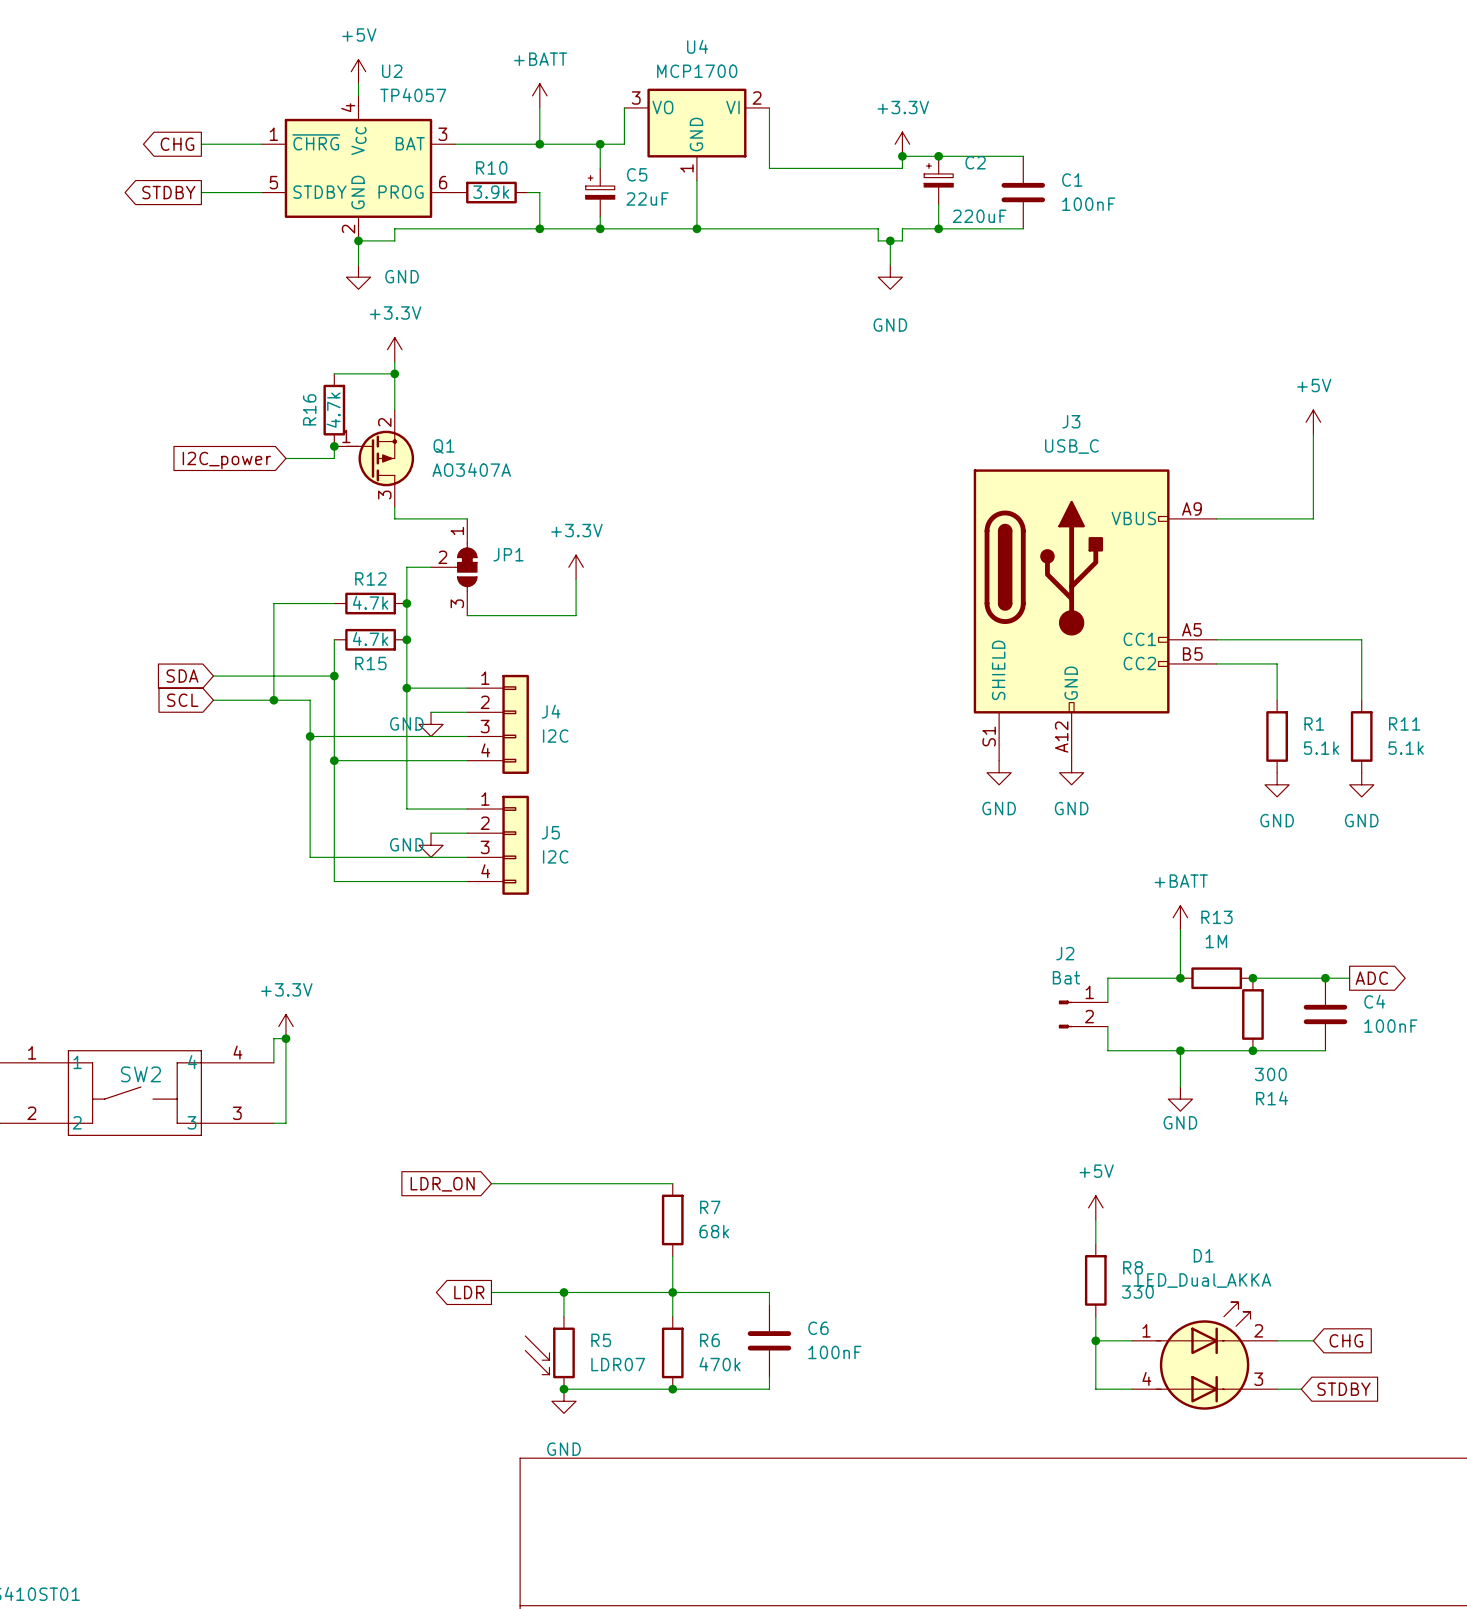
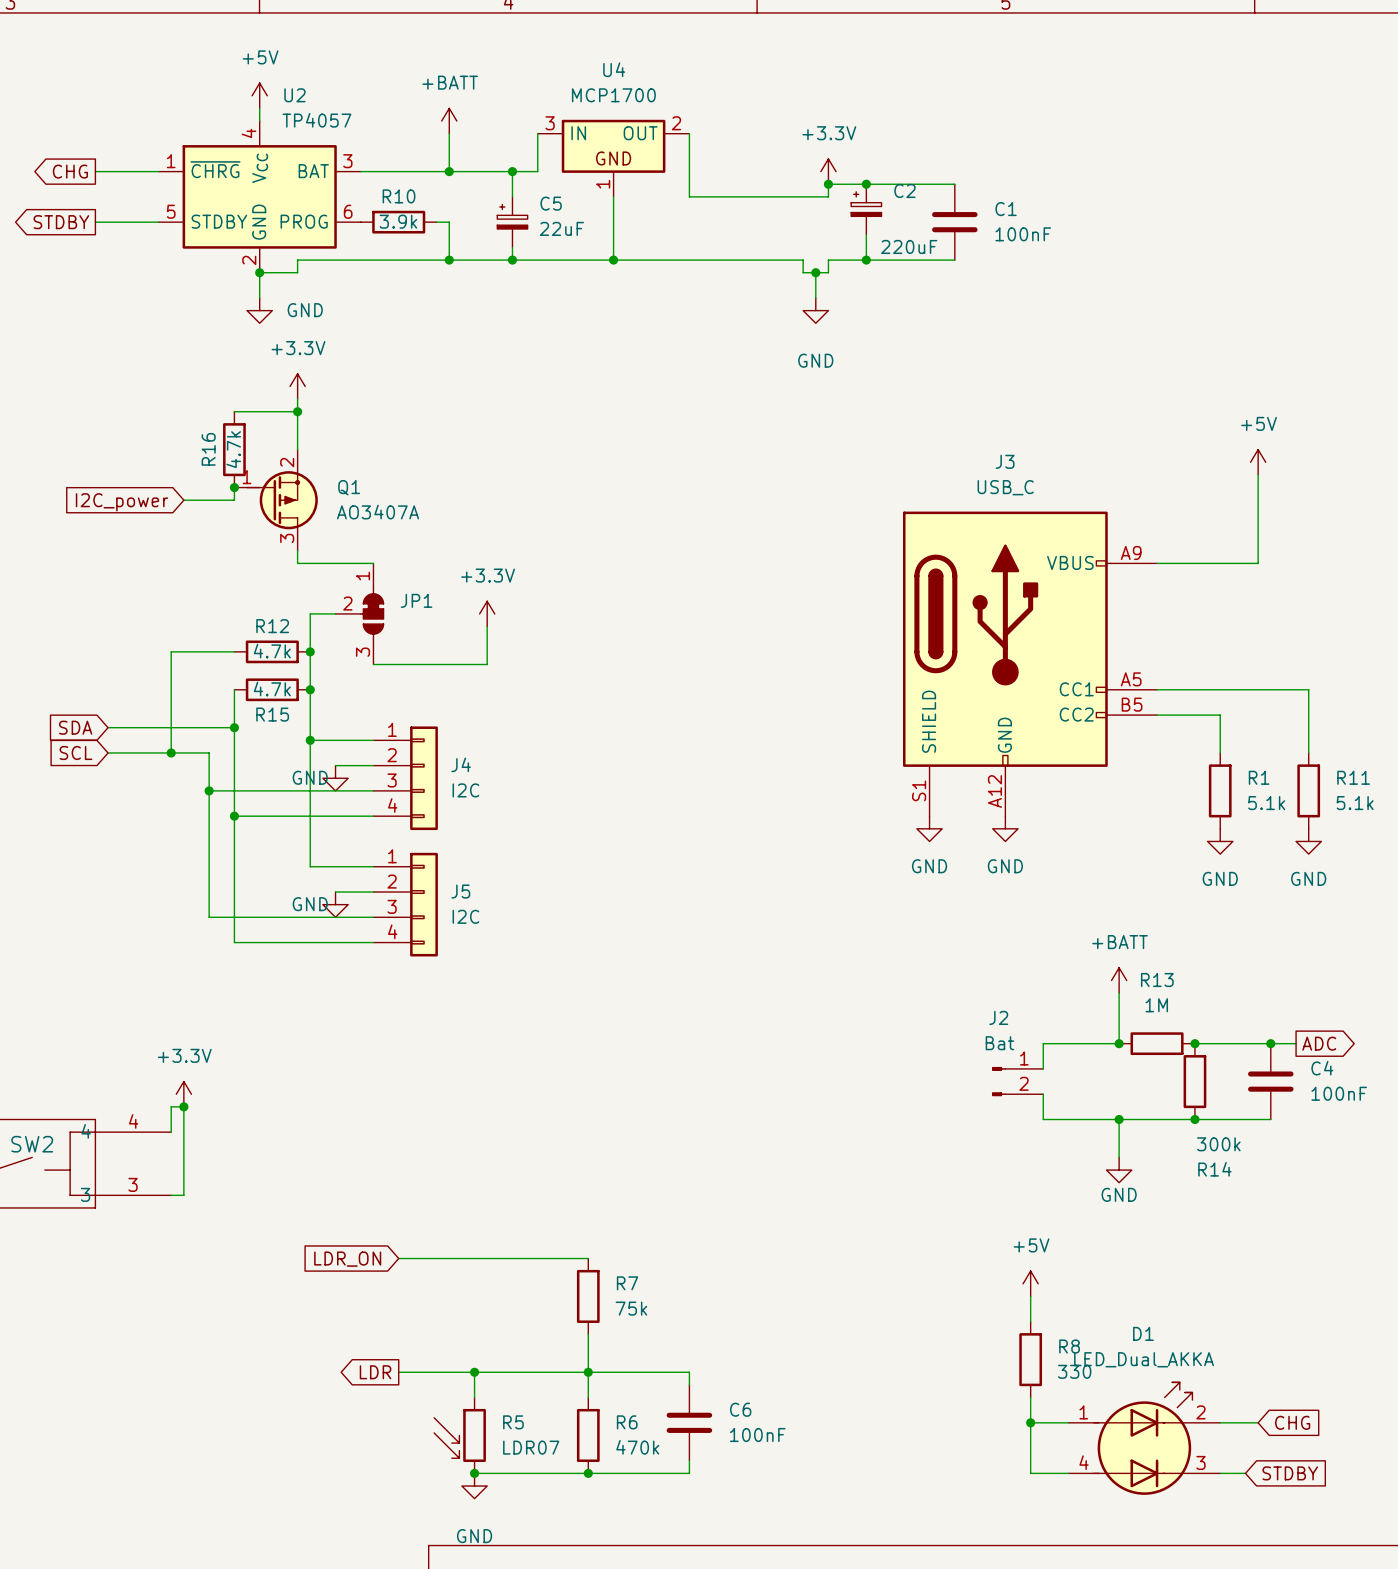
U4 symbol: [624, 88, 770, 181] -> [537, 119, 690, 197]
R14 value: 300 (1270, 1074) -> 300k (1218, 1144)
R7 value: 68k (714, 1231) -> 75k (631, 1308)

